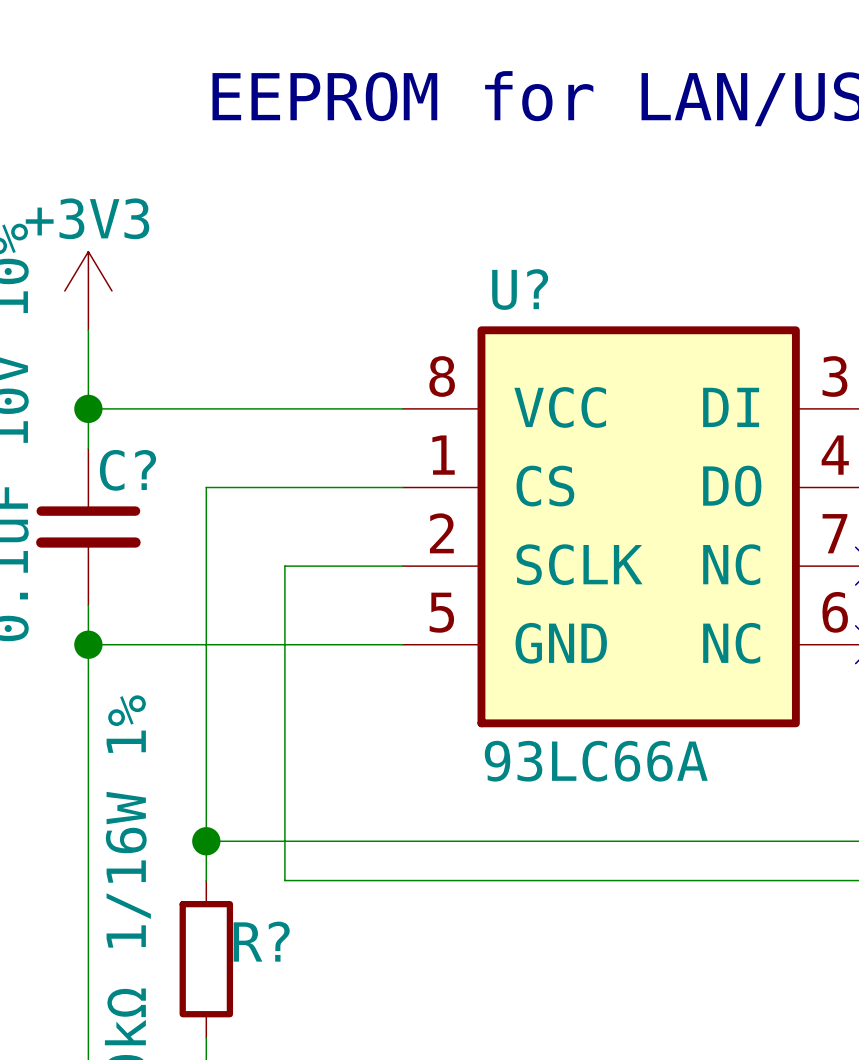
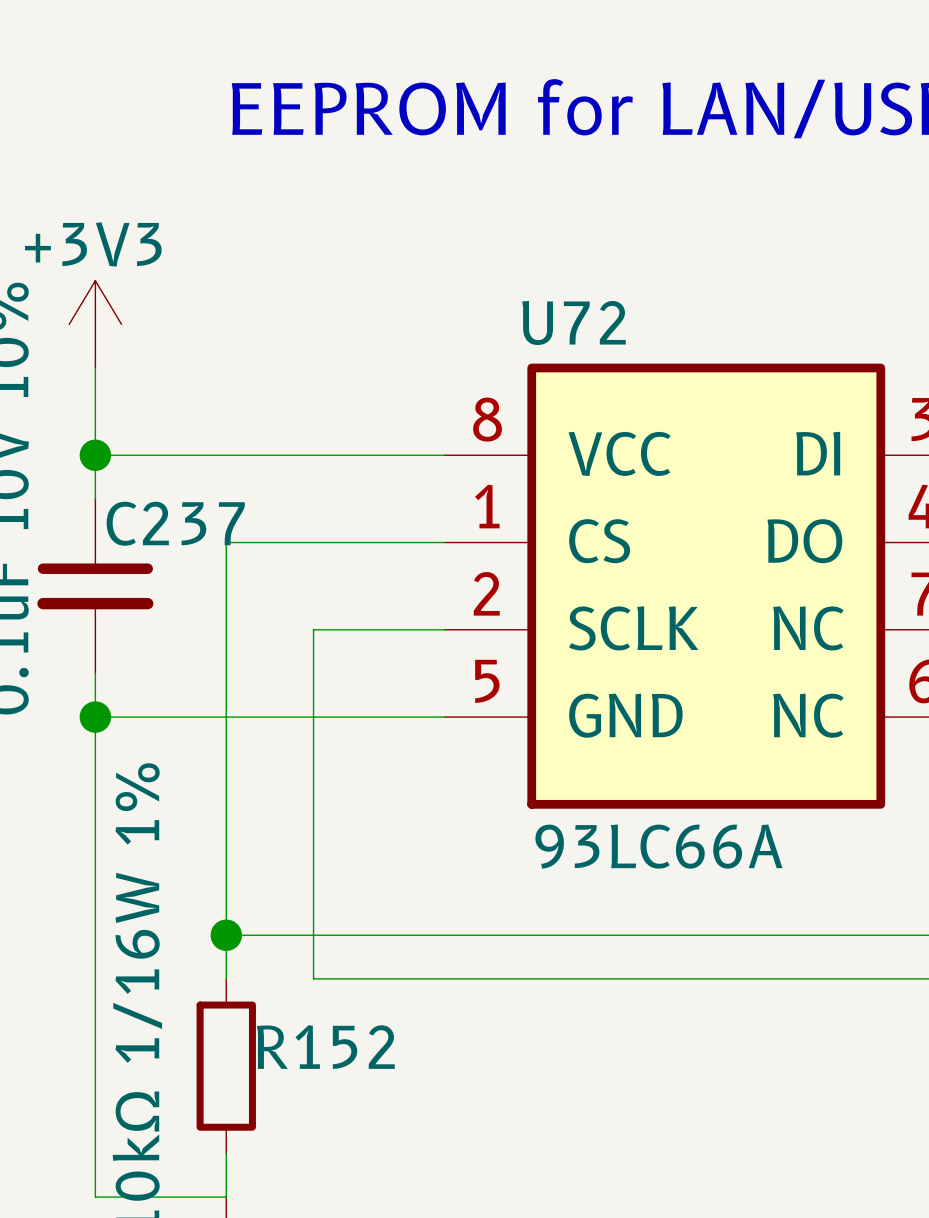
U? name: U? (520, 289) -> U72 (574, 322)
C? name: C? (128, 470) -> C237 (175, 523)
R? name: R? (261, 941) -> R152 (325, 1047)

